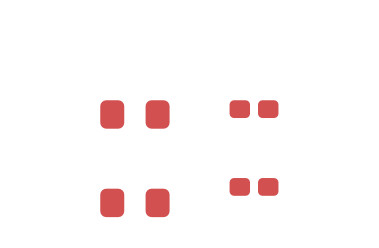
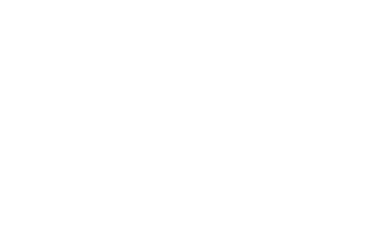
part: (254, 109) -> none
part: (134, 114) -> none
part: (254, 186) -> none
part: (134, 202) -> none

